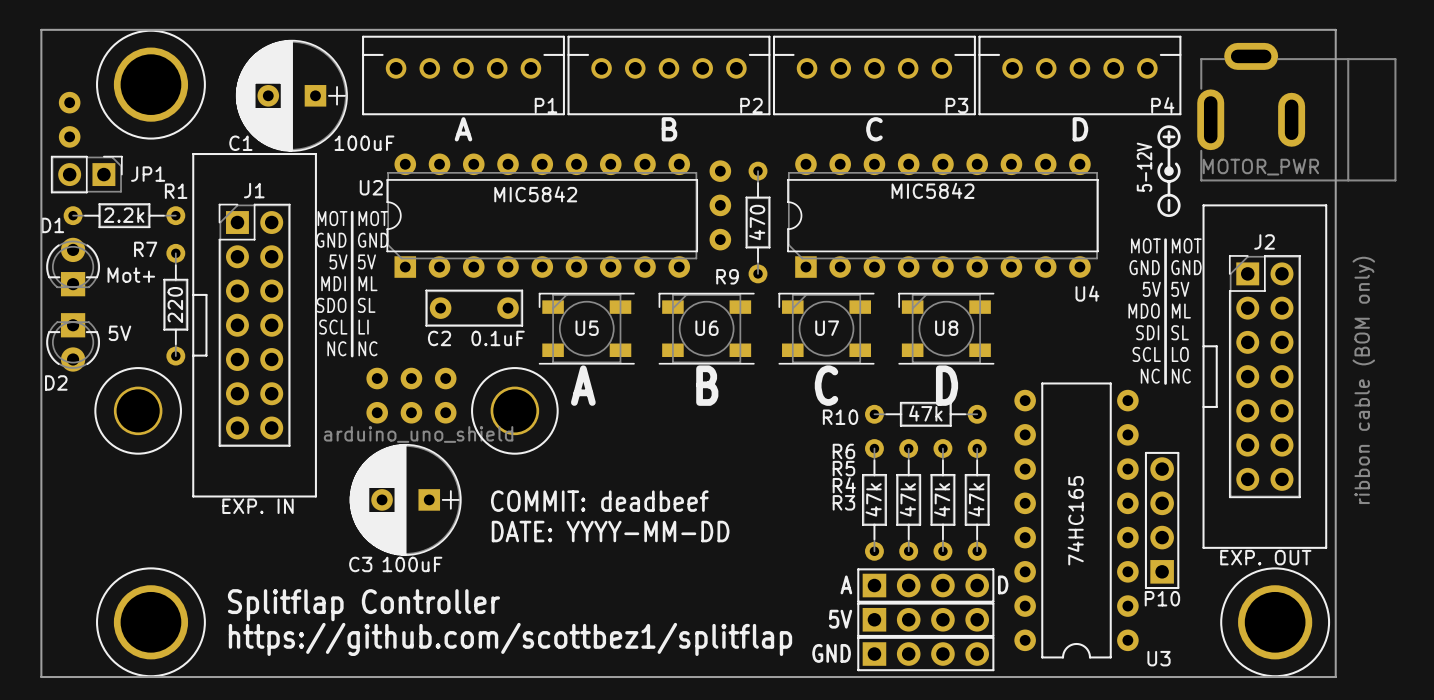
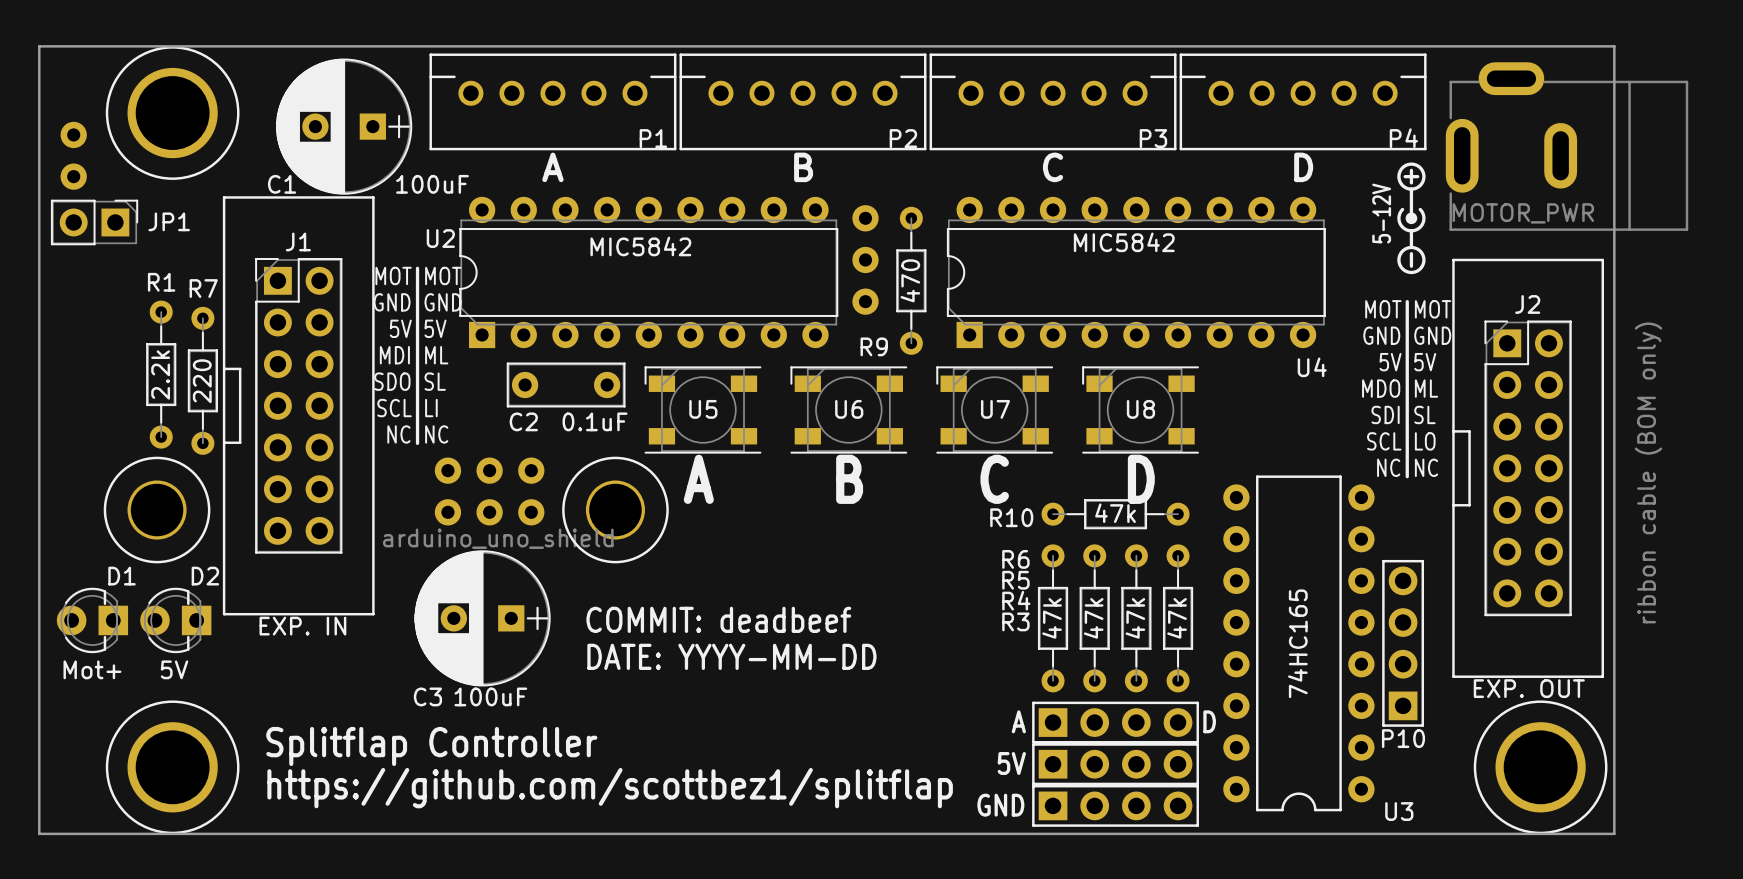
R1 name position: R1 (176, 191) -> R1 (161, 282)
R1 rotation: 0° (124, 215) -> 90° clockwise (161, 374)
R1 position: (124, 215) -> (161, 374)
D1 name position: D1 (52, 225) -> D1 (122, 576)
R7 name position: R7 (145, 249) -> R7 (203, 288)
D1 rotation: 0° (73, 267) -> 90° counterclockwise (92, 620)
D1 position: (73, 267) -> (92, 620)
D1 value position: Mot+ (131, 275) -> Mot+ (92, 669)
D2 rotation: 0° (73, 342) -> 90° clockwise (175, 620)
D2 position: (73, 342) -> (175, 620)
D2 name position: D2 (56, 382) -> D2 (205, 576)

